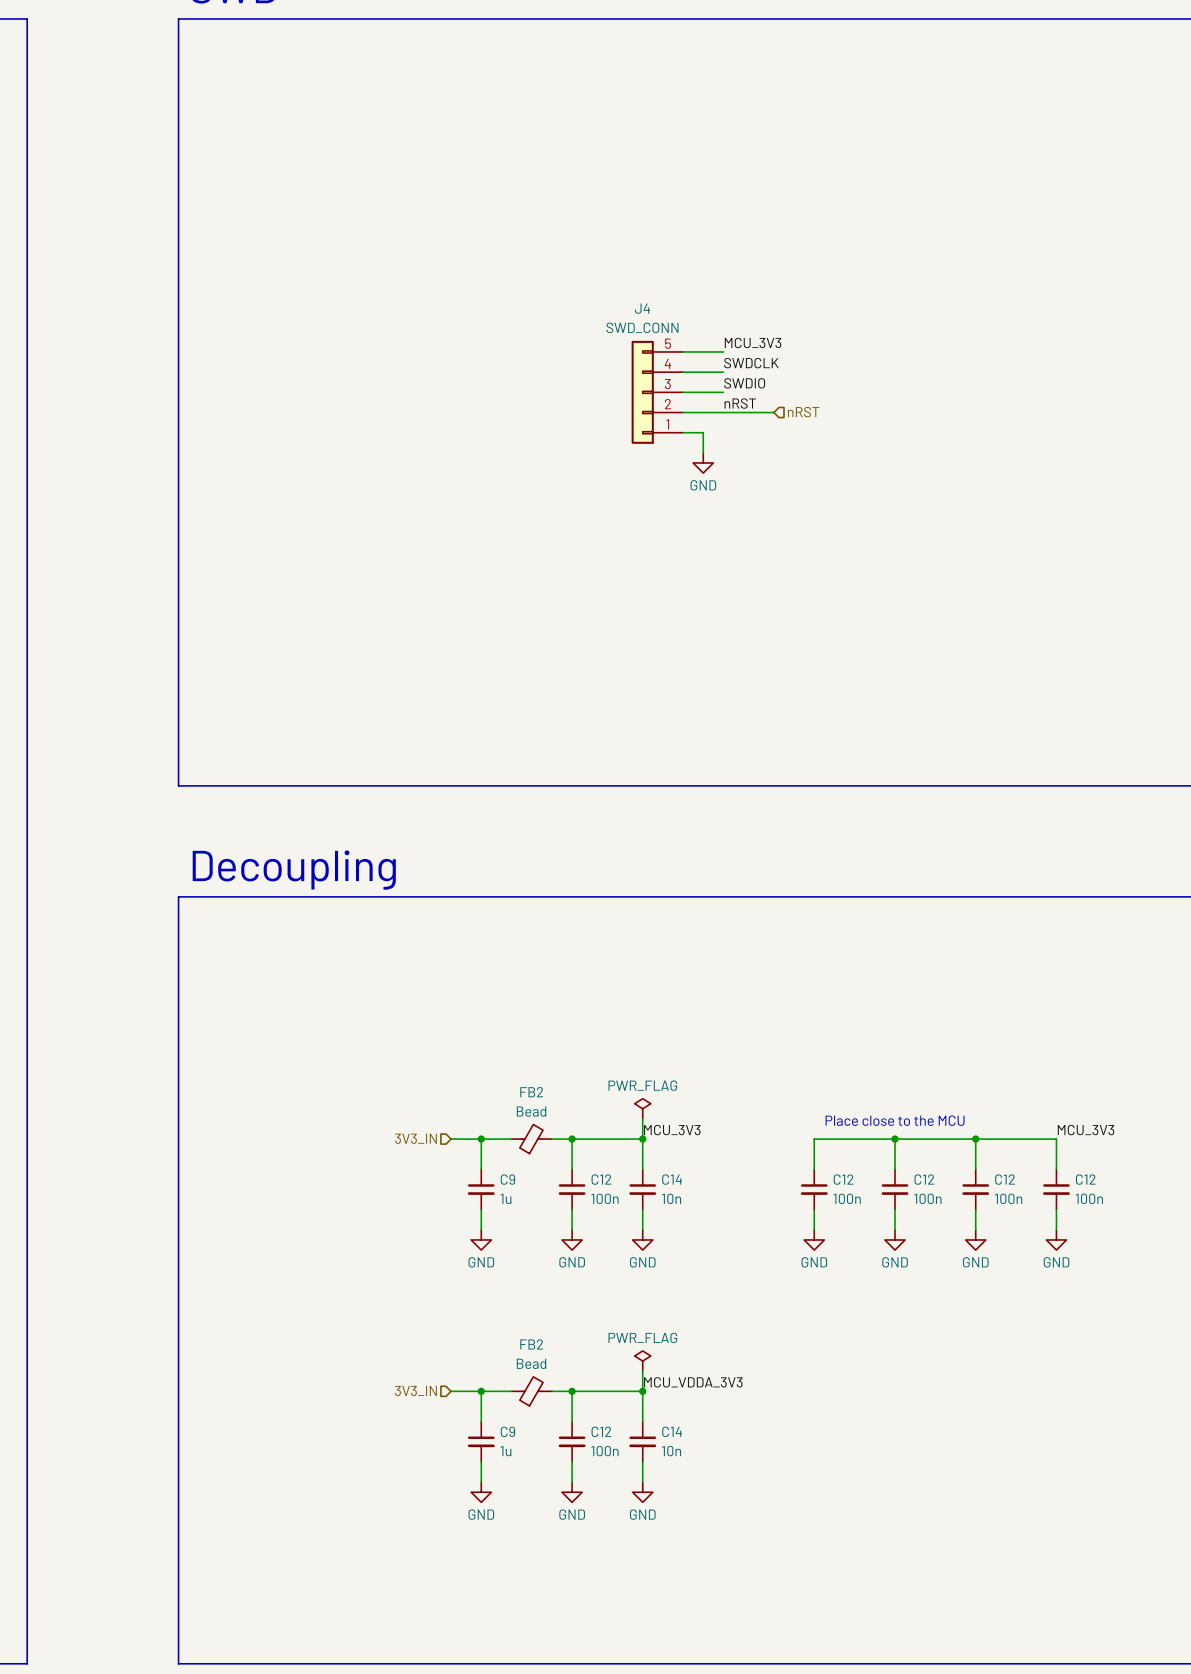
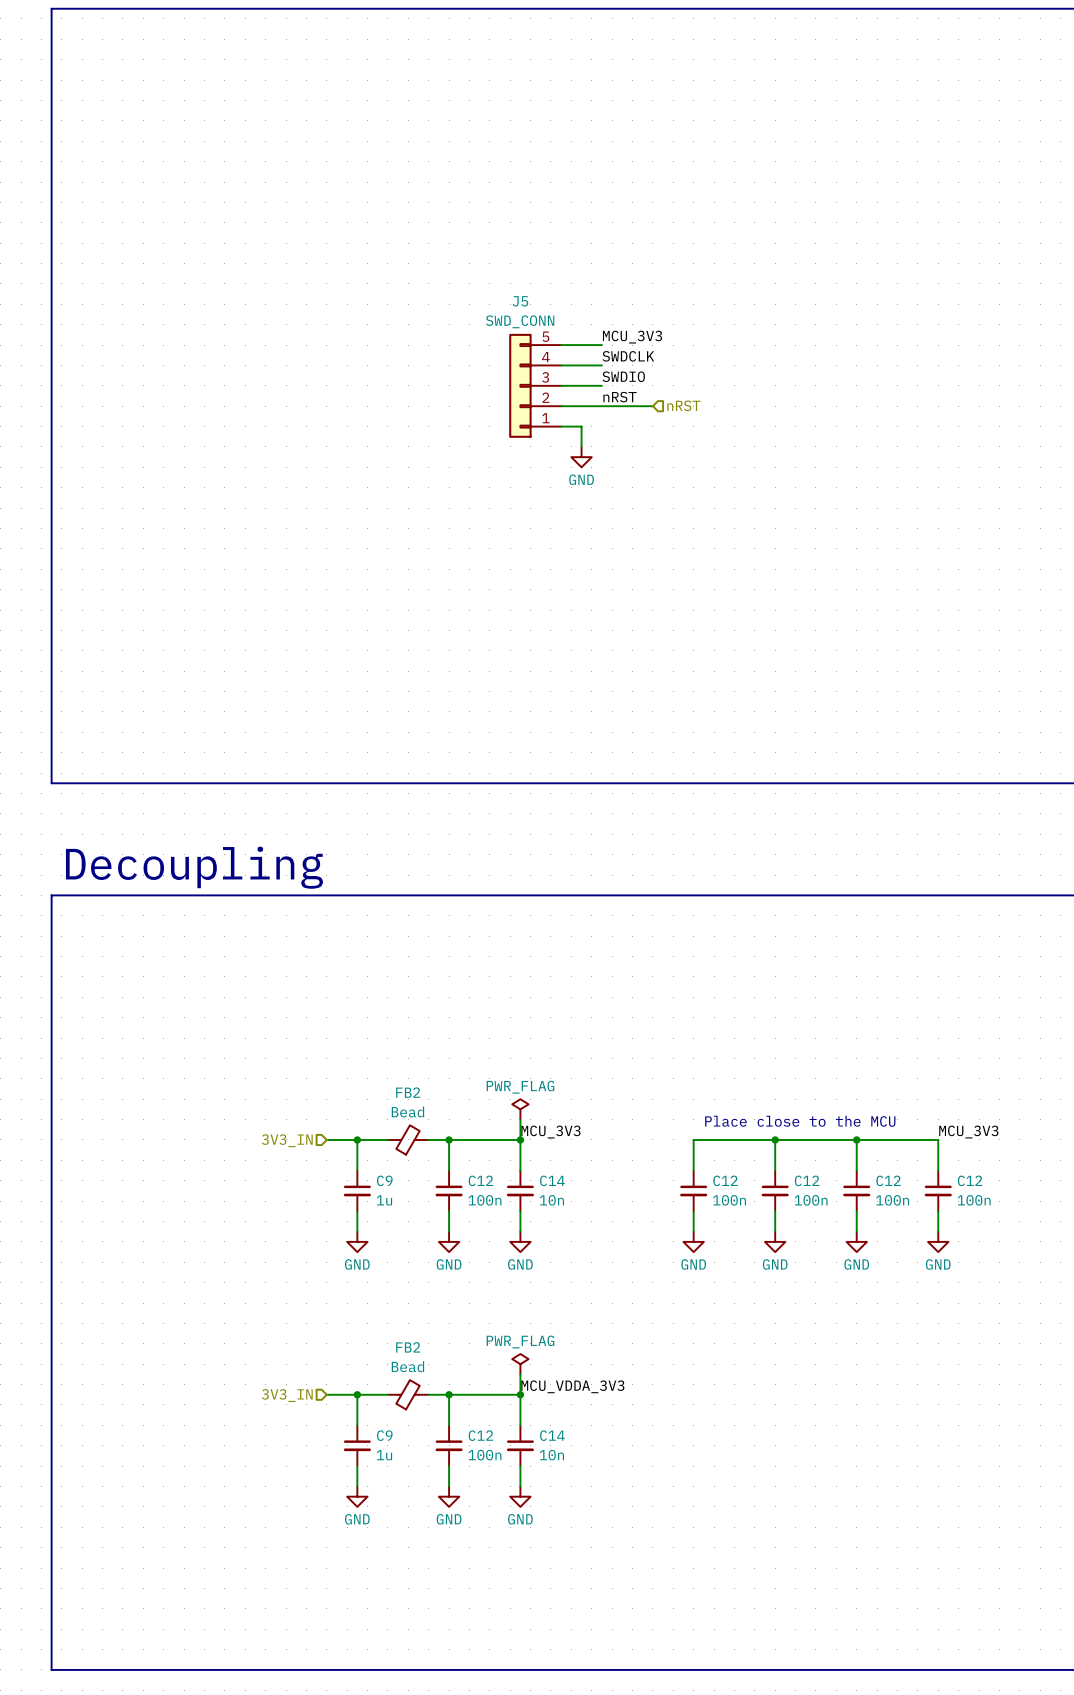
J4 name: J4 (642, 308) -> J5 (520, 301)

